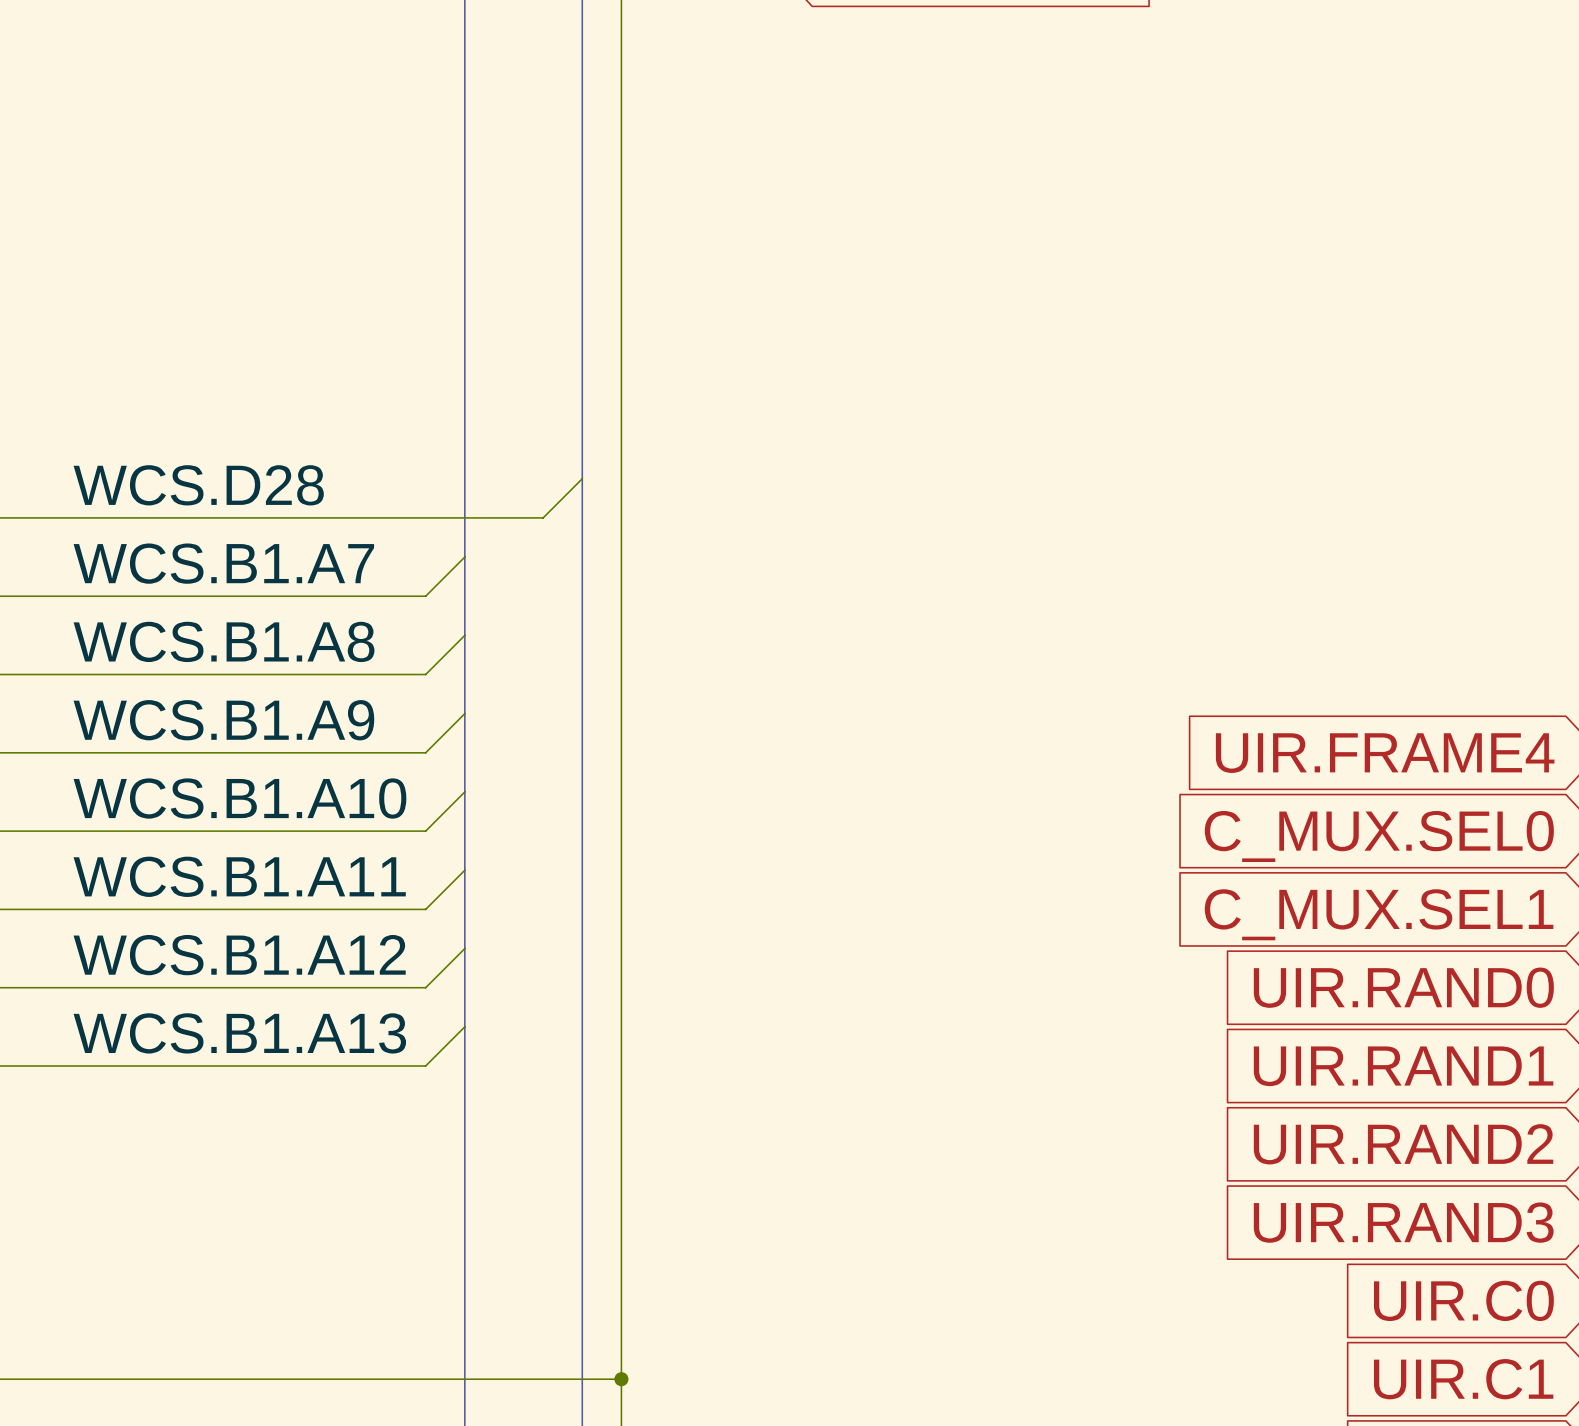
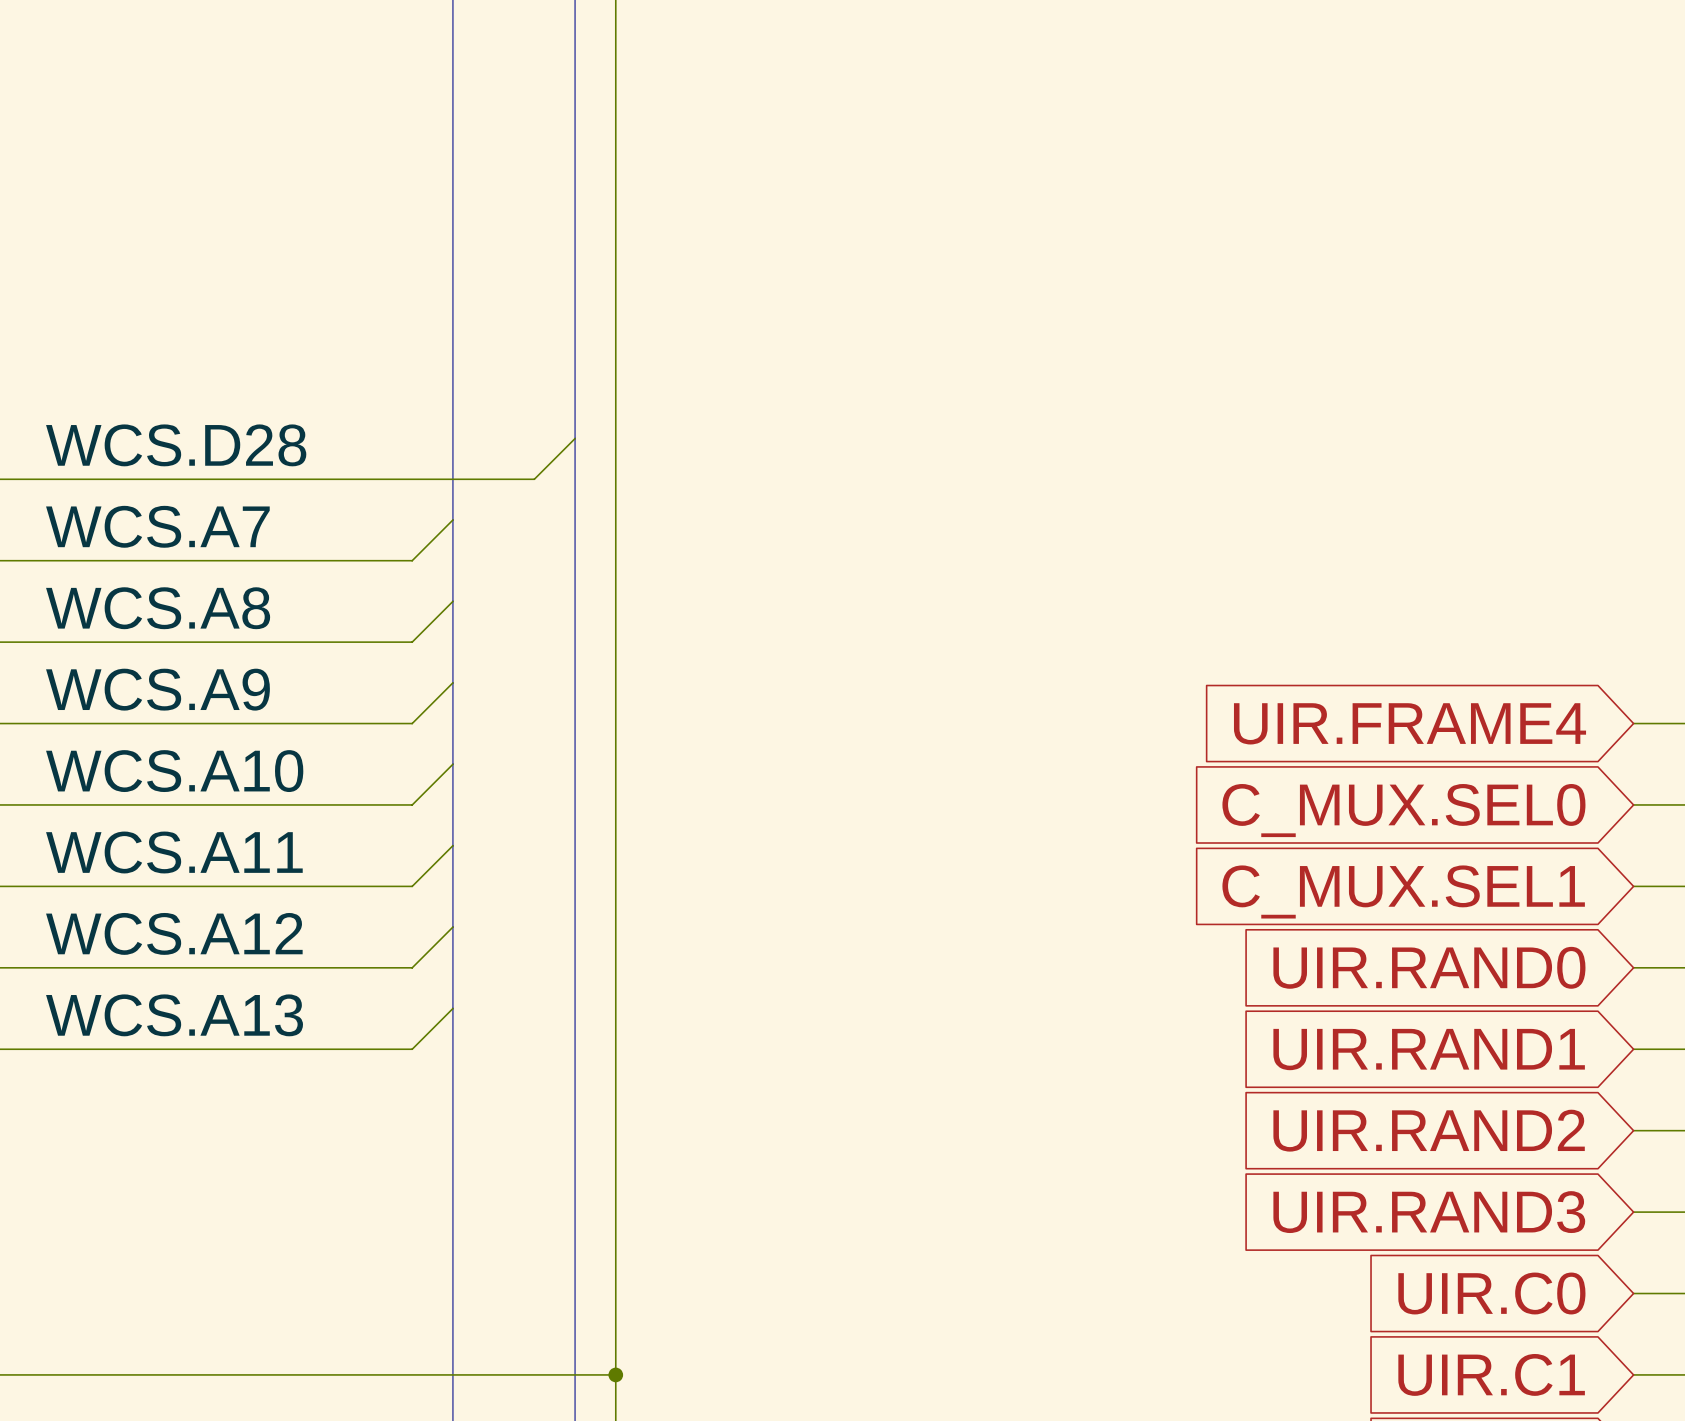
label: WCS.B1.A7 (223, 563) -> WCS.A7 (157, 526)
label: WCS.B1.A8 (224, 641) -> WCS.A8 (158, 608)
label: WCS.B1.A9 (223, 720) -> WCS.A9 (157, 689)
label: WCS.B1.A10 (239, 798) -> WCS.A10 (174, 771)
label: WCS.B1.A11 (239, 876) -> WCS.A11 (174, 852)
label: WCS.B1.A12 (239, 955) -> WCS.A12 (174, 933)
label: WCS.B1.A13 (239, 1033) -> WCS.A13 (174, 1015)

